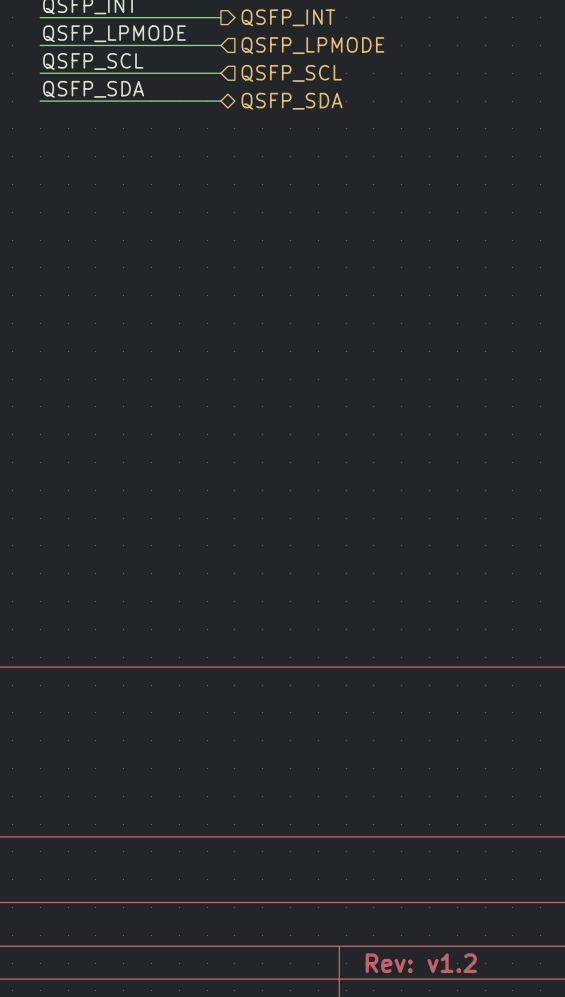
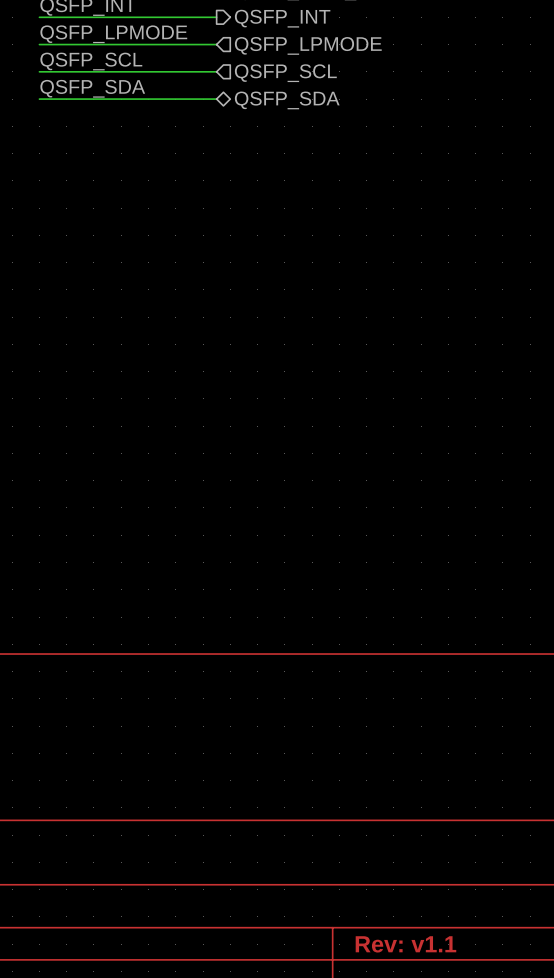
title block: Rev: v1.2 (421, 963) -> Rev: v1.1 (405, 944)

